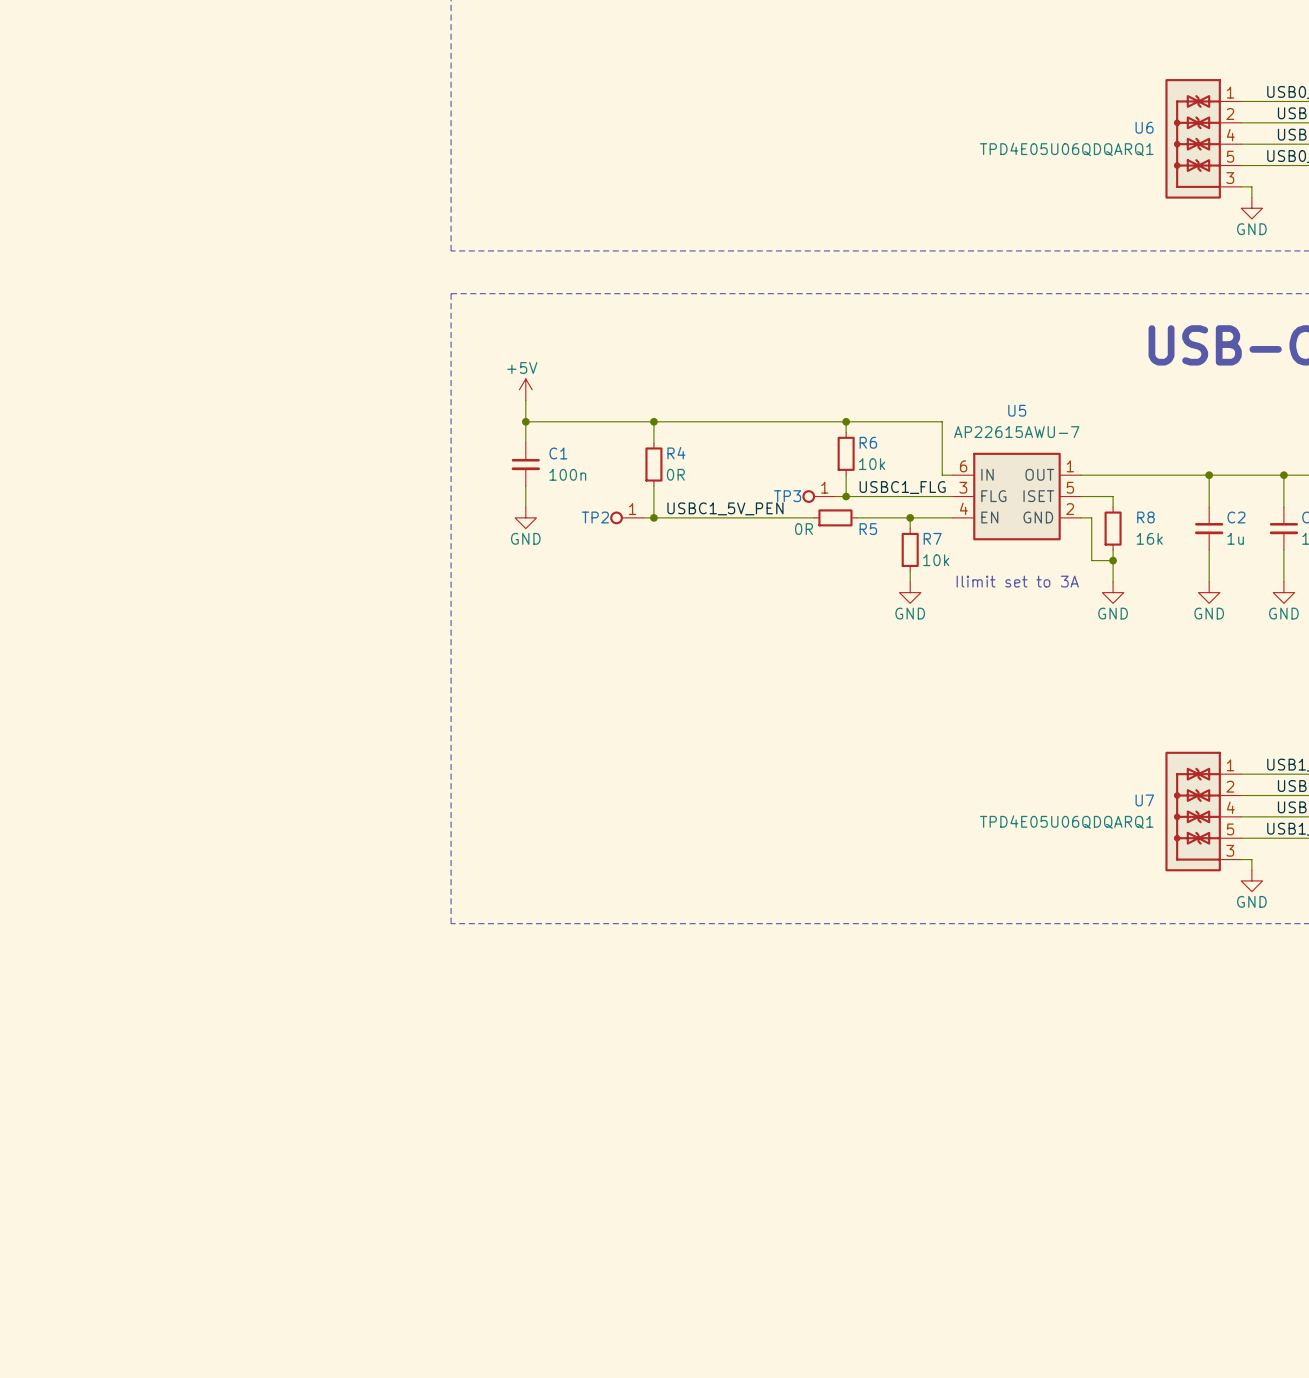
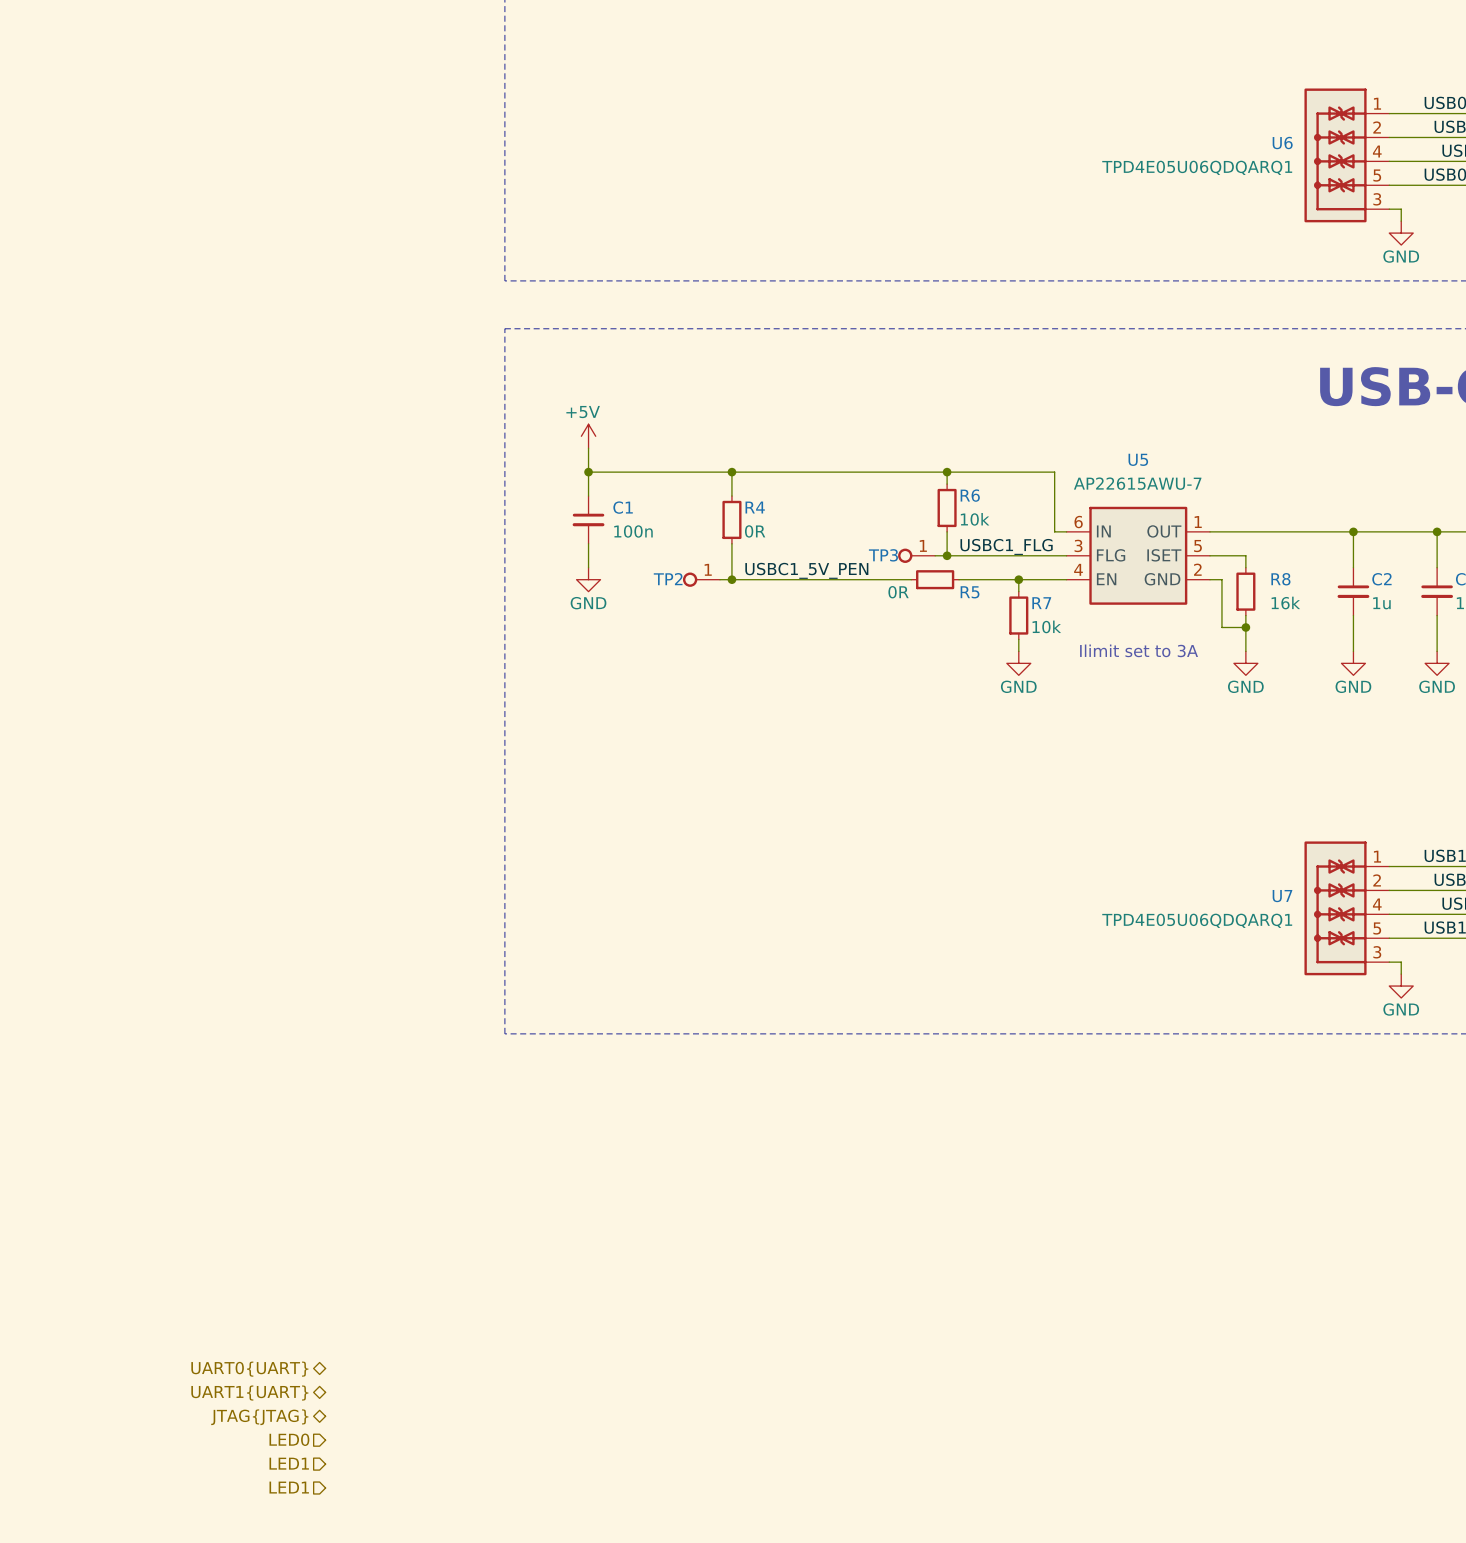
hierarchical label: none -> UART0{UART} (249, 1369)
hierarchical label: none -> UART1{UART} (249, 1393)
hierarchical label: none -> JTAG{JTAG} (259, 1417)
hierarchical label: none -> LED0 (289, 1439)
hierarchical label: none -> LED1 (289, 1463)
hierarchical label: none -> LED1 (289, 1487)

